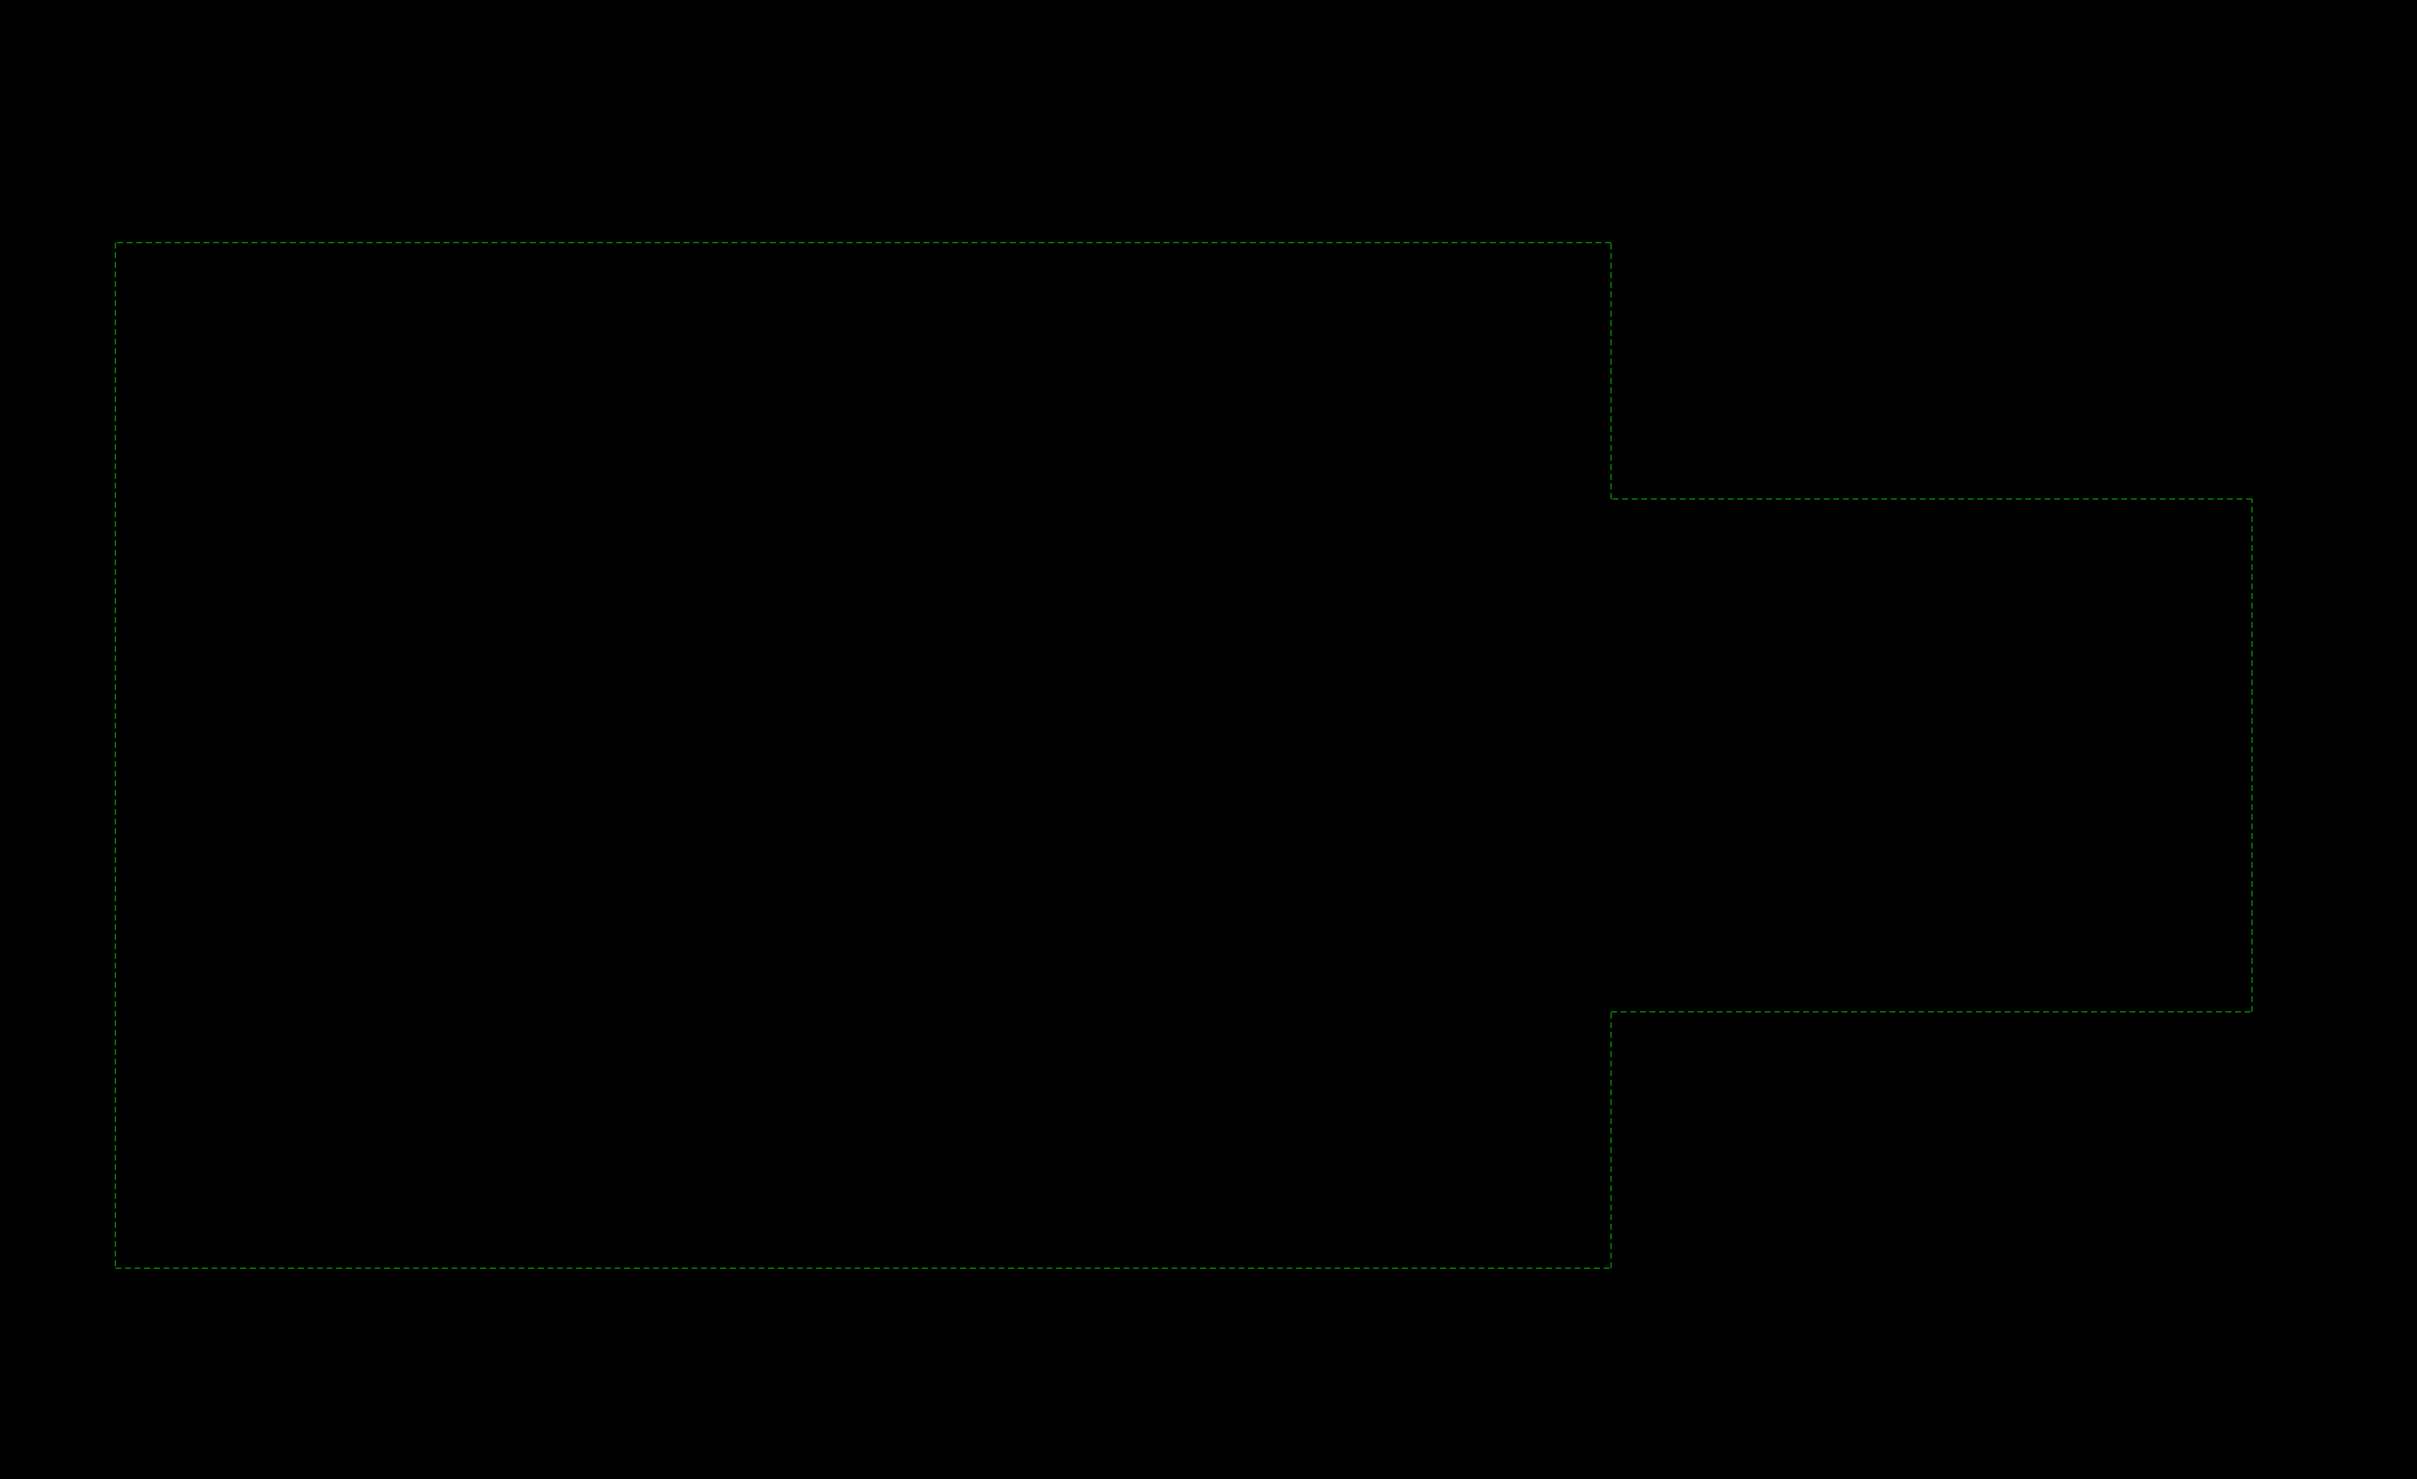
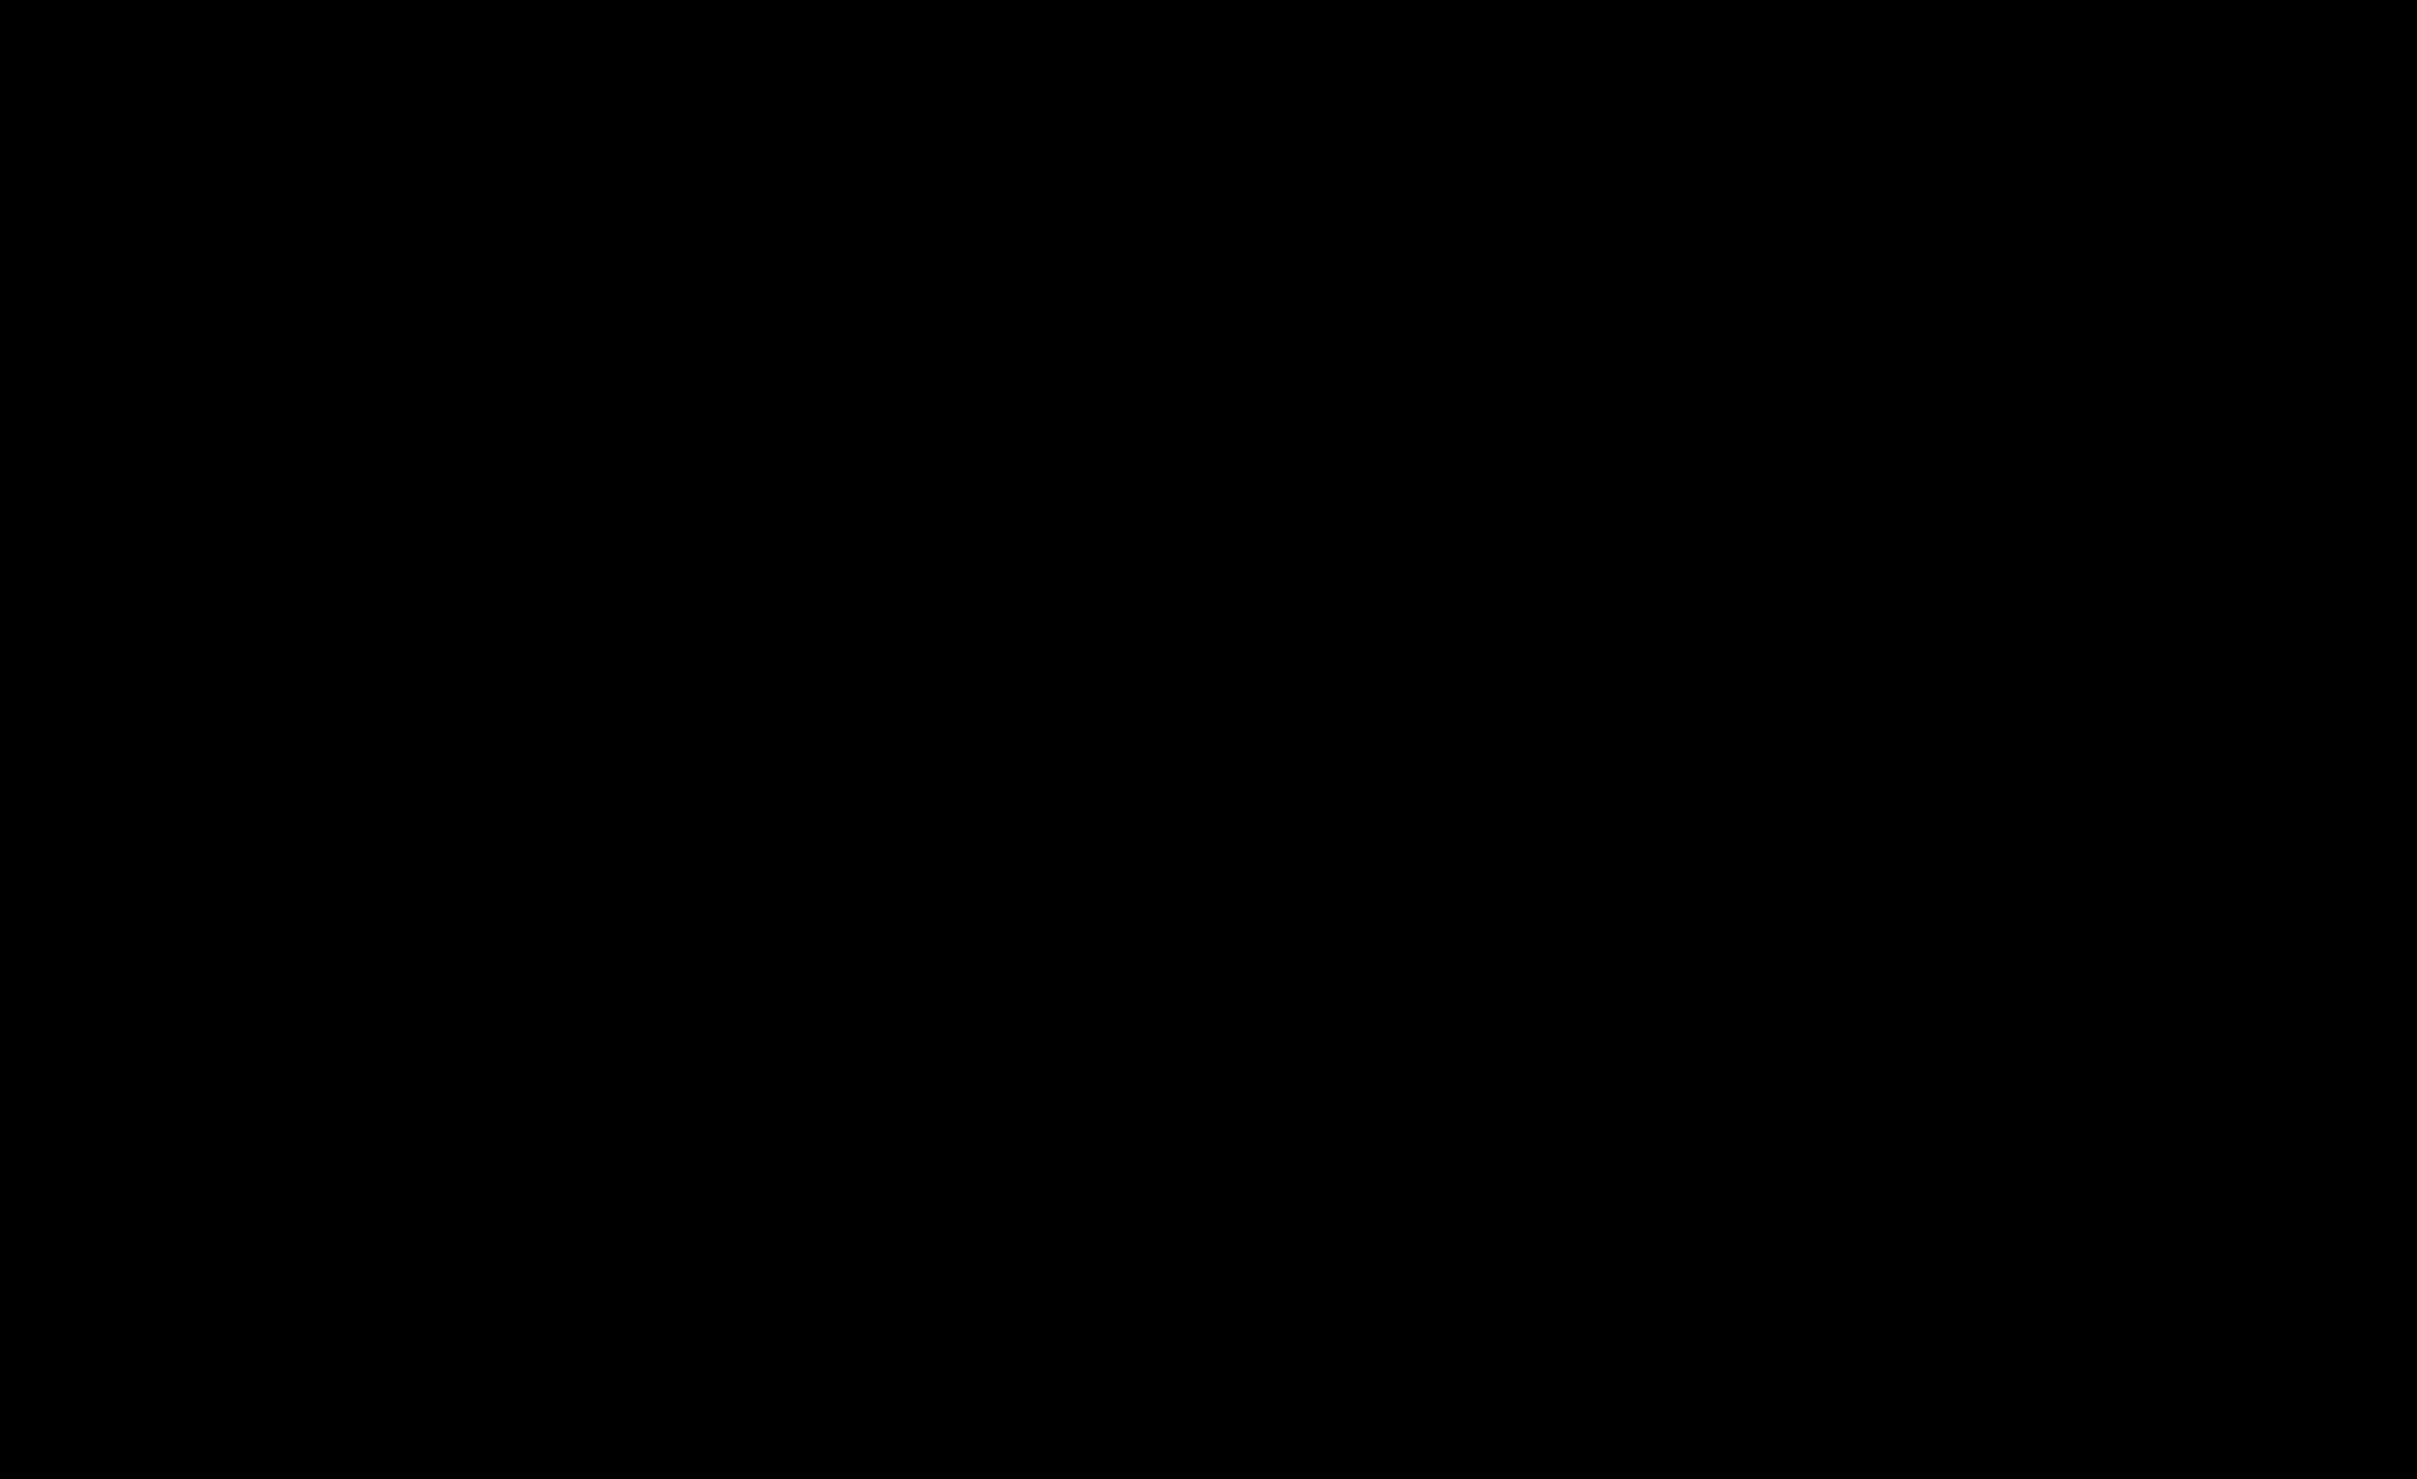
zone outline: (1611, 242) (1611, 499) (2252, 499) (2252, 1011) (1611, 1011) (1611, 1268) (115, 1268) (115, 242) (1611, 242) -> none

